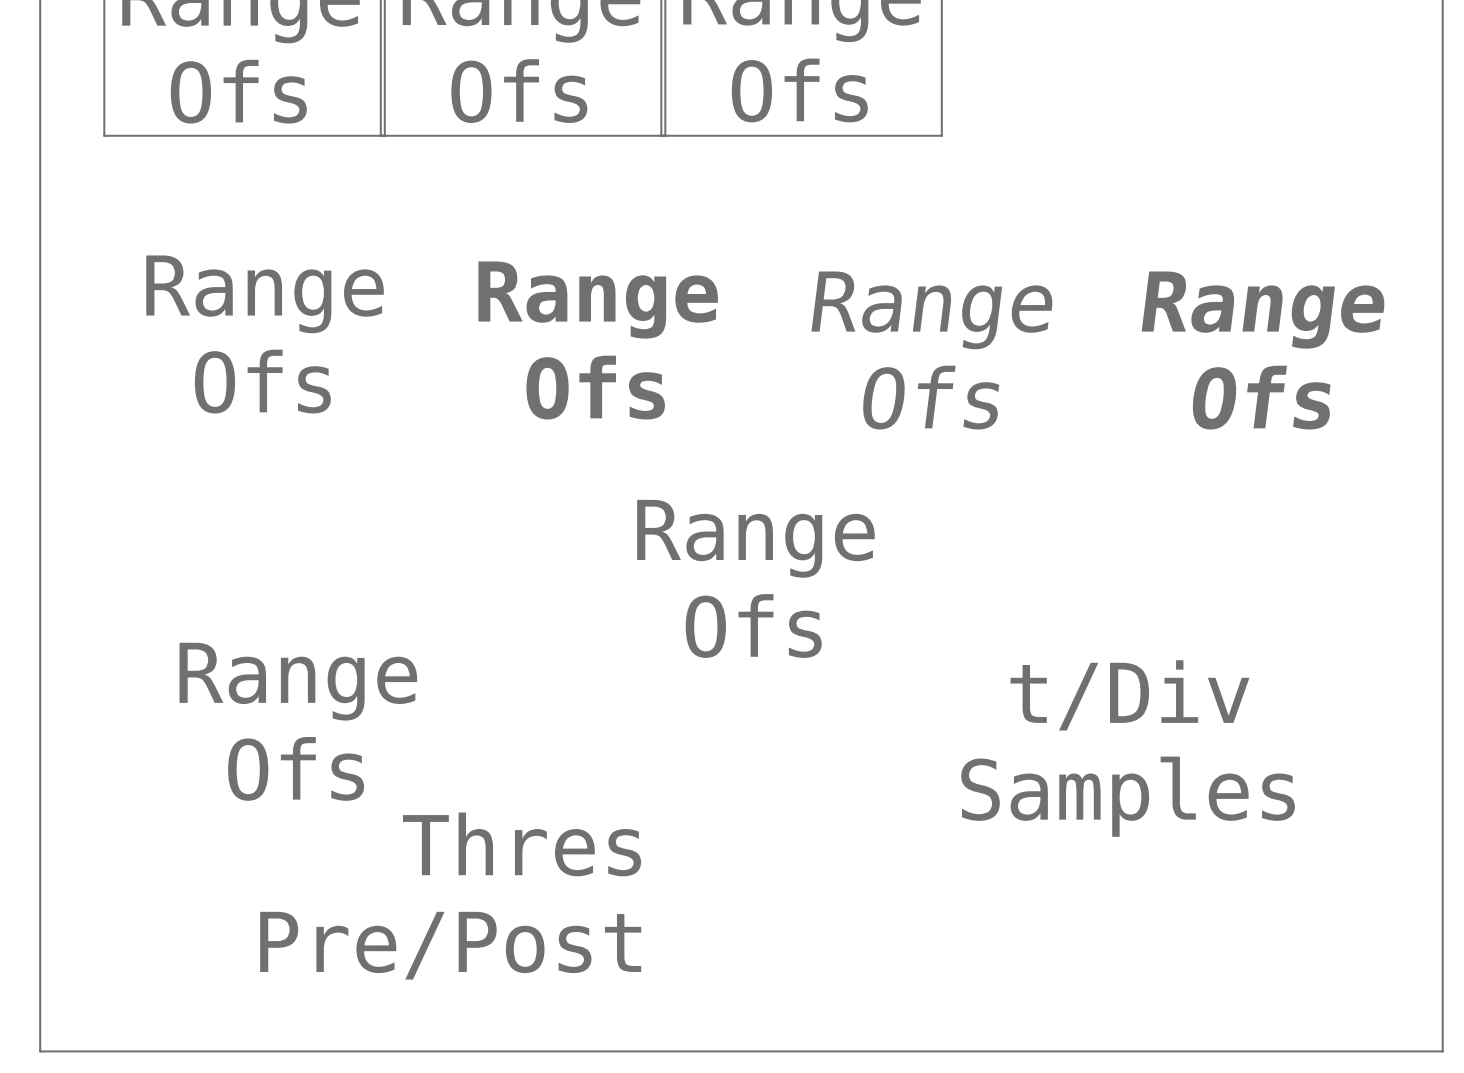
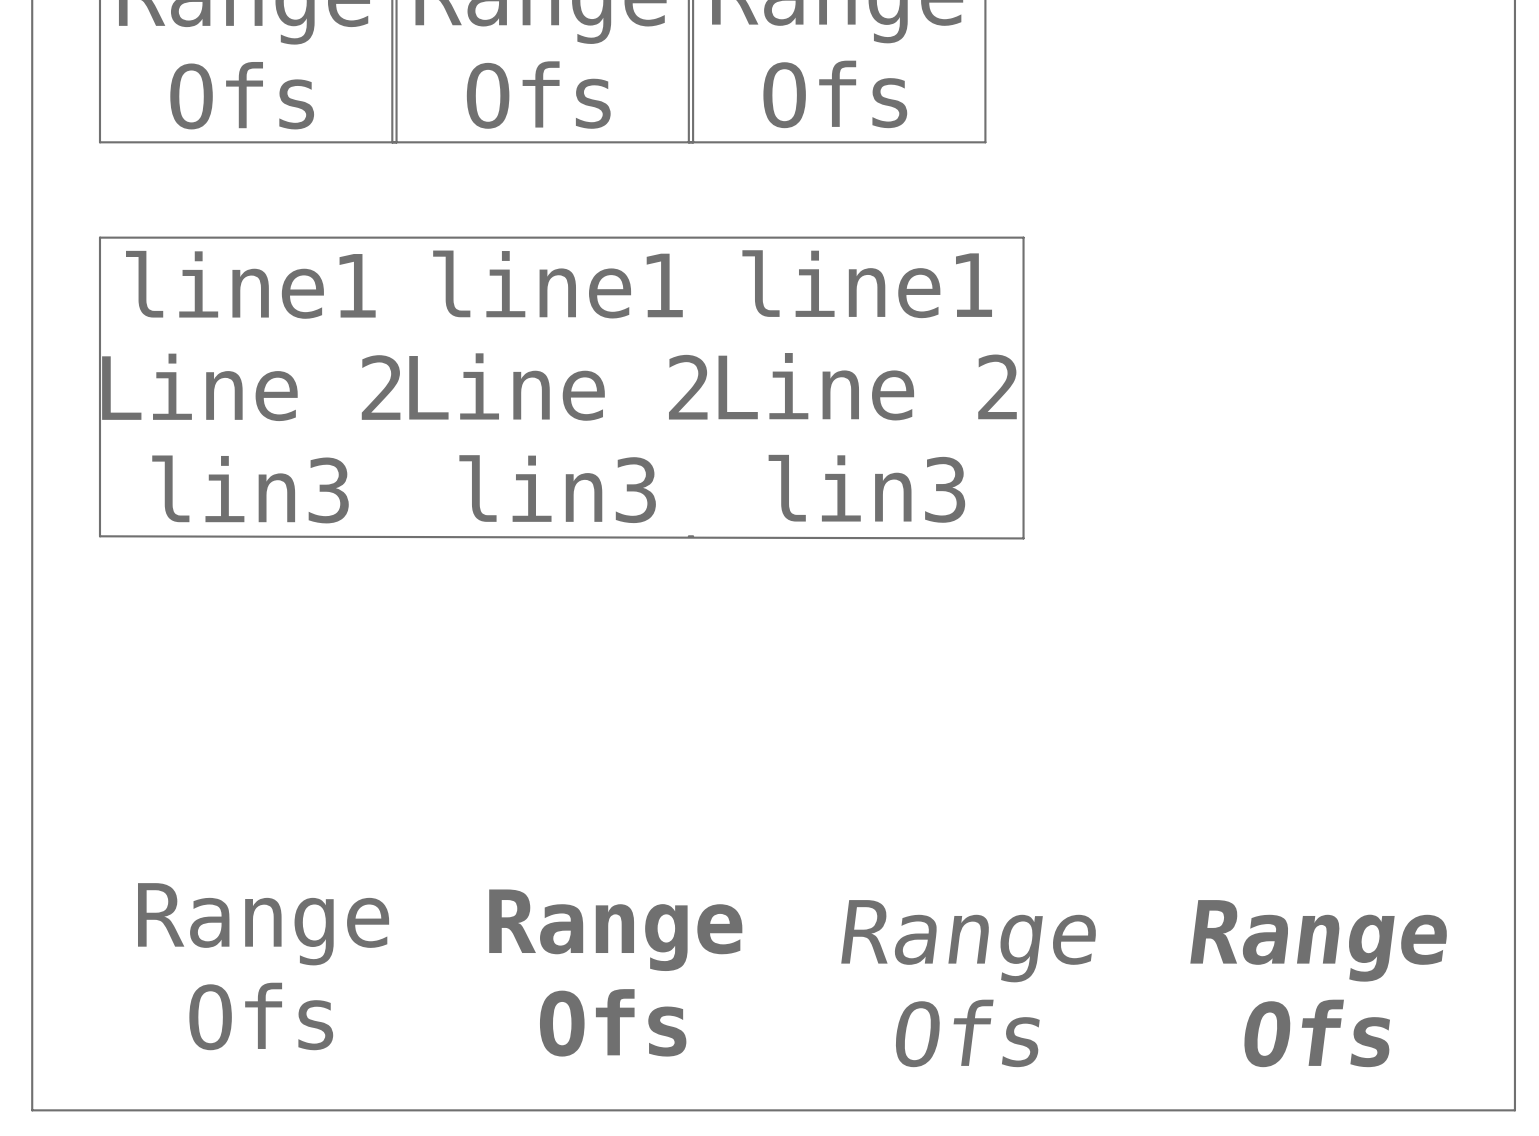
line: none -> (99, 237) (1023, 237) (1023, 538) (99, 536) (99, 237)
text: none -> line1 (867, 284)
text: none -> line1 (250, 284)
text: none -> line1 (557, 284)
text: Range (265, 294) -> none
text: Range (598, 300) -> none
text: Range (932, 310) -> none
text: Range (1263, 310) -> none
text: none -> Line 2 (867, 386)
text: none -> Line 2 (251, 387)
text: none -> Line 2 (558, 387)
text: Ofs (262, 381) -> none
text: Ofs (595, 387) -> none
text: Ofs (930, 397) -> none
text: Ofs (1261, 397) -> none
text: none -> lin3 (557, 489)
text: none -> lin3 (866, 488)
text: none -> lin3 (250, 489)
line: none -> (688, 536) (693, 536)
text: Range (755, 538) -> none
text: Ofs (753, 626) -> none
text position: Range (298, 681) -> Range (263, 924)
text: t/Div (1129, 695) -> none
text position: Ofs (296, 768) -> Ofs (261, 1016)
text: Samples (1128, 796) -> none
text: Thres (522, 844) -> none
text: none -> Range (615, 930)
text: none -> Range (969, 941)
text: none -> Range (1319, 940)
text: Pre/Post (450, 945) -> none
text: none -> Ofs (613, 1022)
text: none -> Ofs (967, 1033)
text: none -> Ofs (1316, 1033)

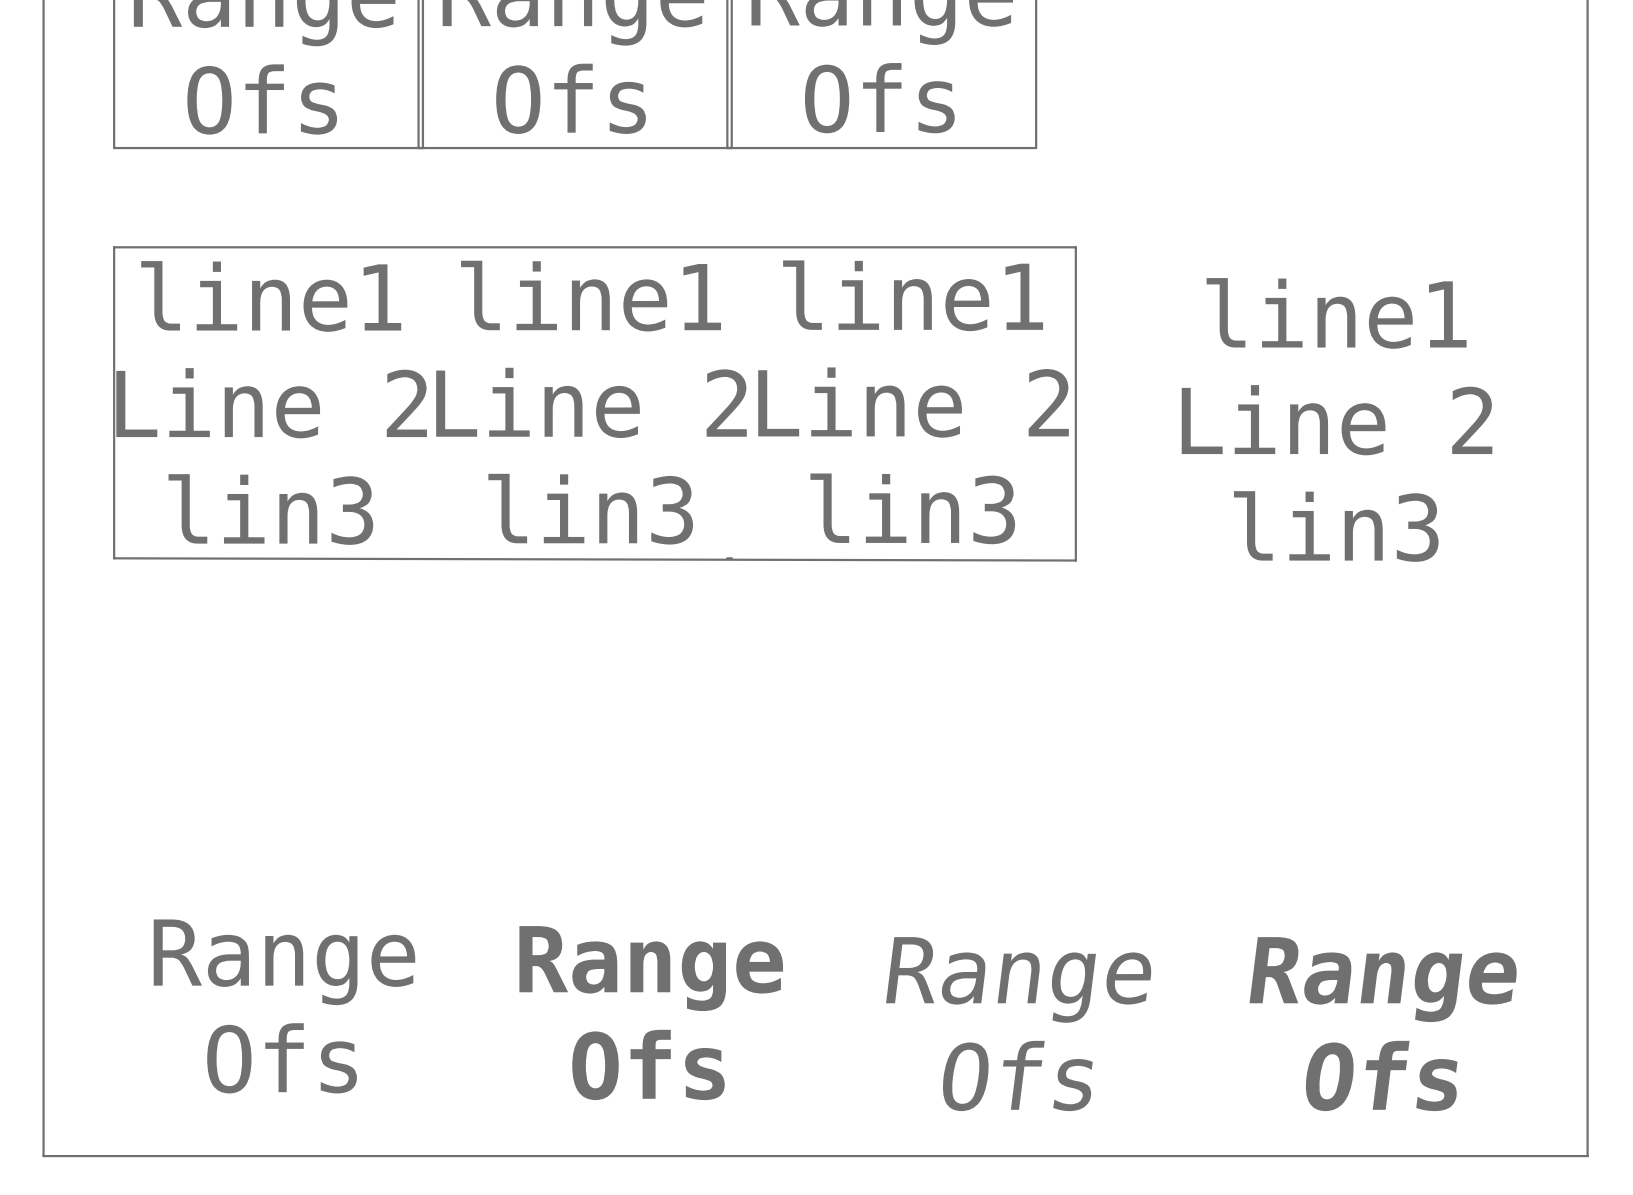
text: none -> line1 (1336, 313)
text: none -> Line 2 (1337, 420)
text: none -> lin3 (1336, 526)

